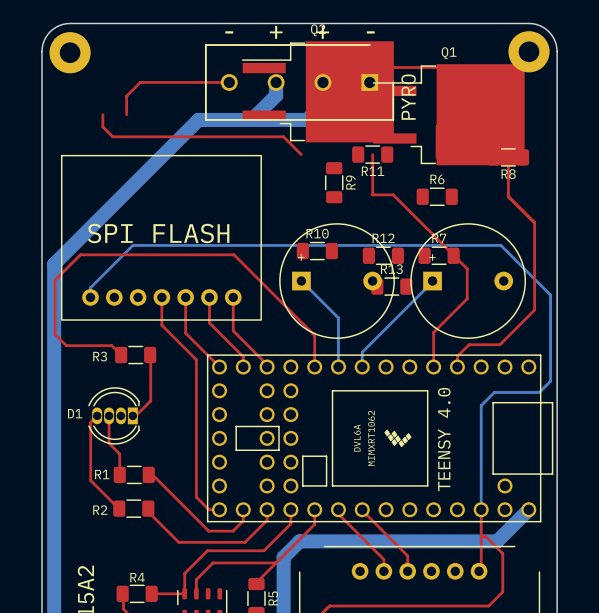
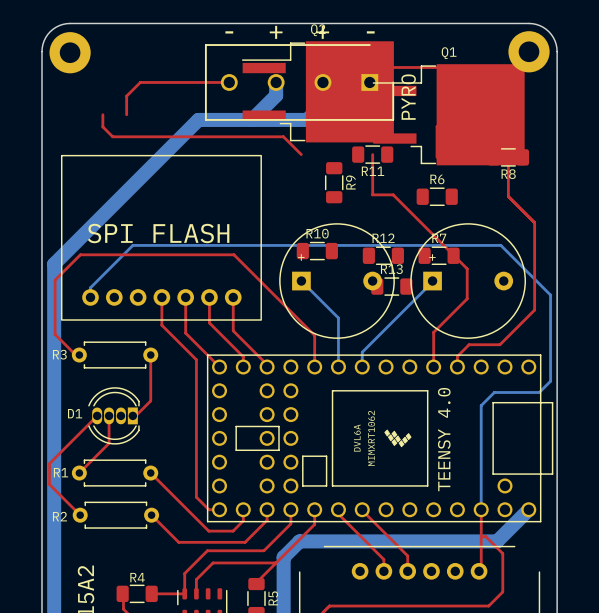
top track: (66, 345) (111, 345) (121, 355) -> (66, 345) (75, 355) (79, 355)
R3 footprint: [115, 345, 157, 365] -> [71, 341, 159, 369]
R3 name position: R3 (100, 356) -> R3 (59, 354)
top track: (97, 415) (90, 422) (90, 480) (119, 508) -> (97, 416) (49, 463) (49, 484) (80, 515)
top track: (109, 443) (119, 454) (119, 474) -> (109, 443) (79, 473)
R1 footprint: [113, 465, 155, 484] -> [71, 459, 159, 487]
R1 name position: R1 (102, 474) -> R1 (61, 472)
R2 footprint: [113, 499, 155, 518] -> [72, 501, 160, 529]
R2 name position: R2 (100, 510) -> R2 (59, 516)

